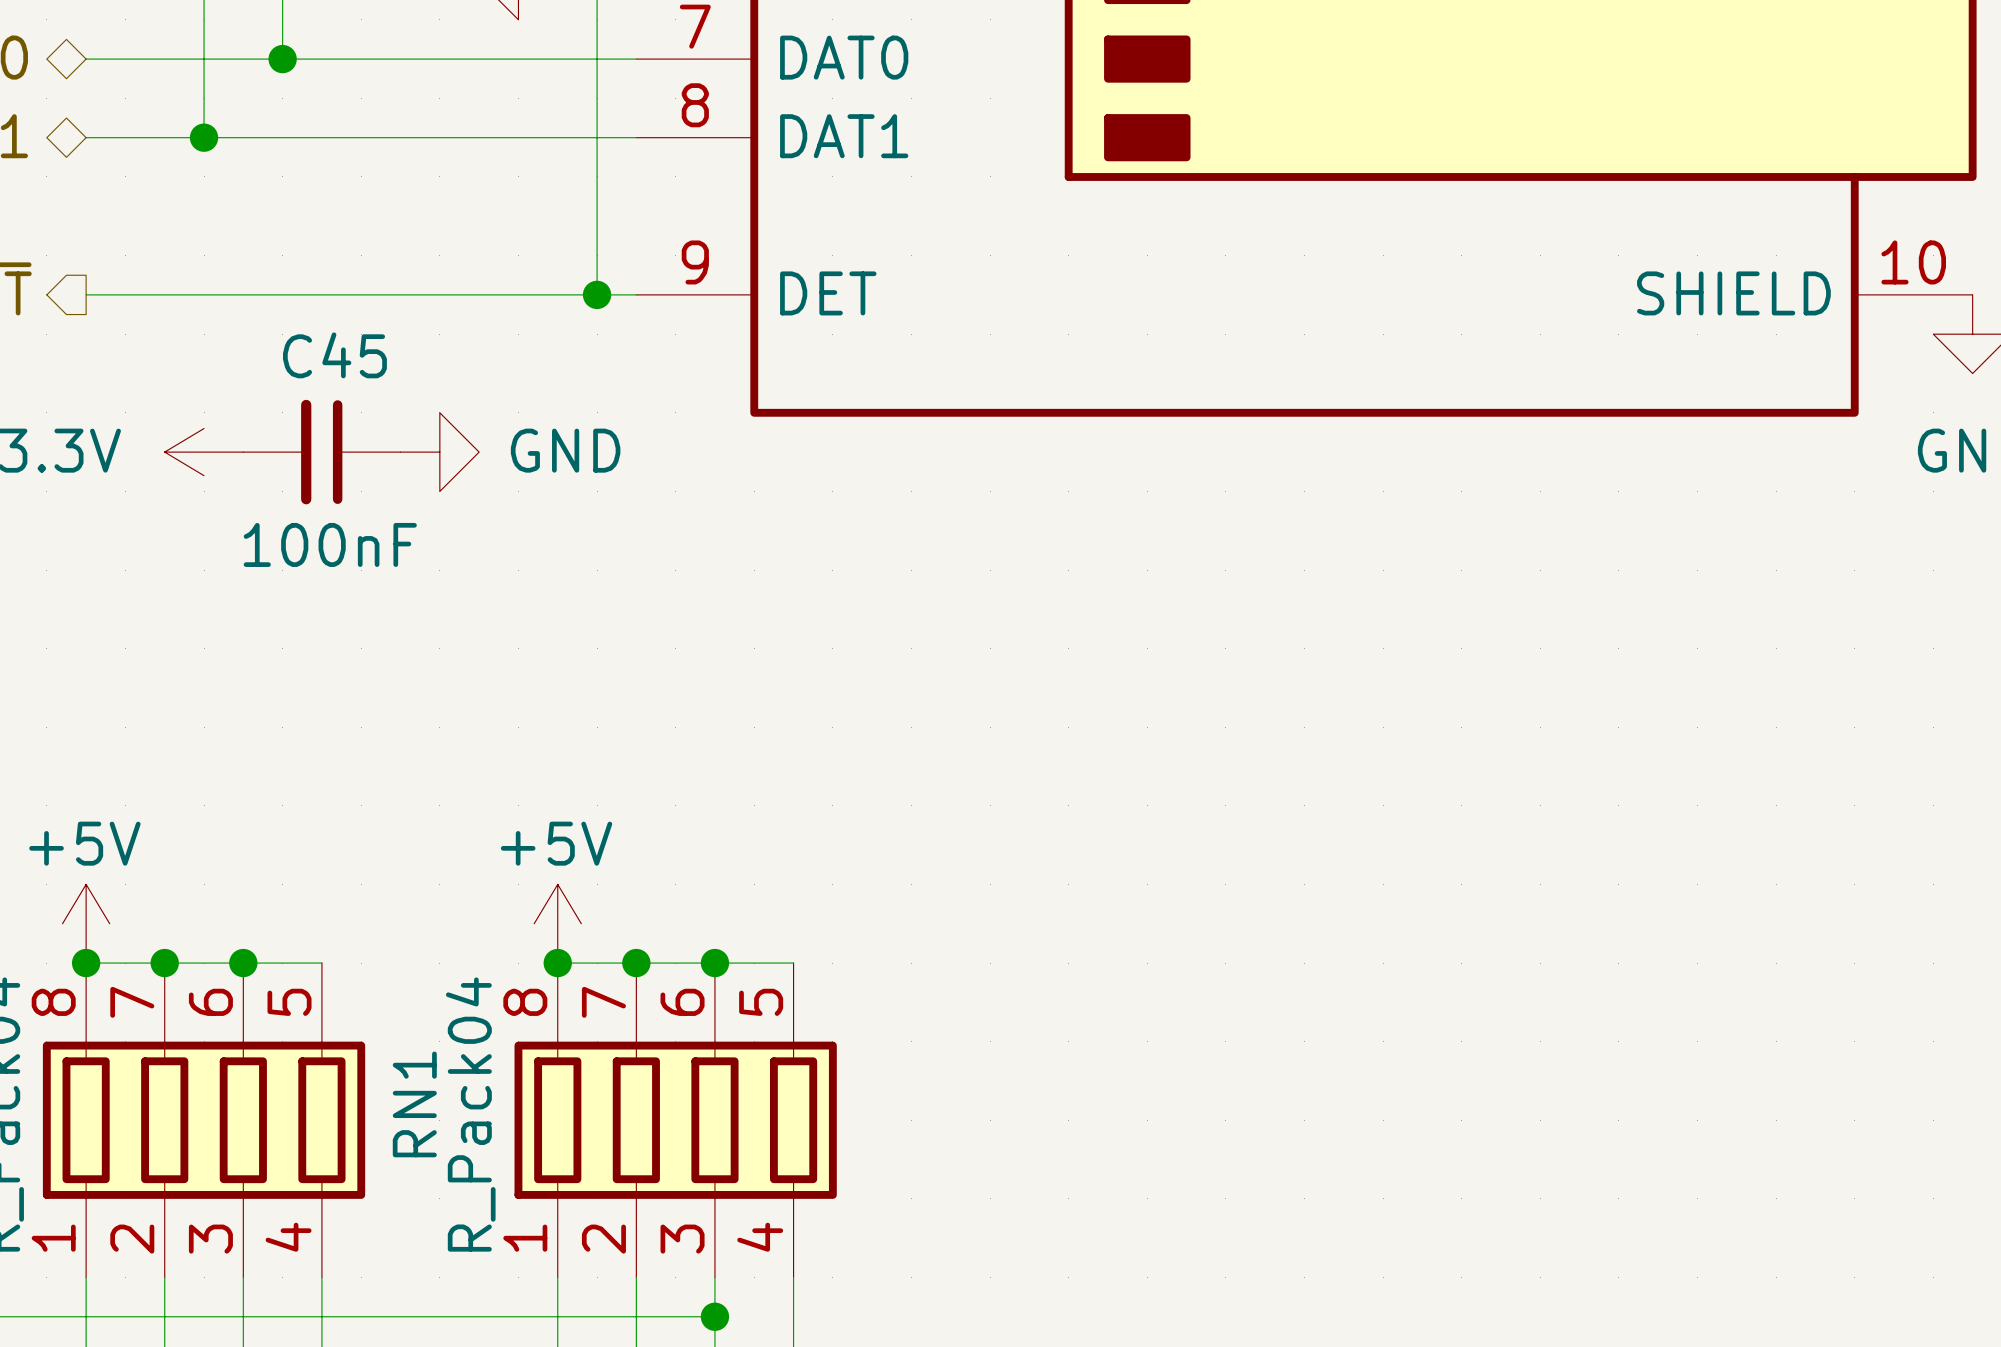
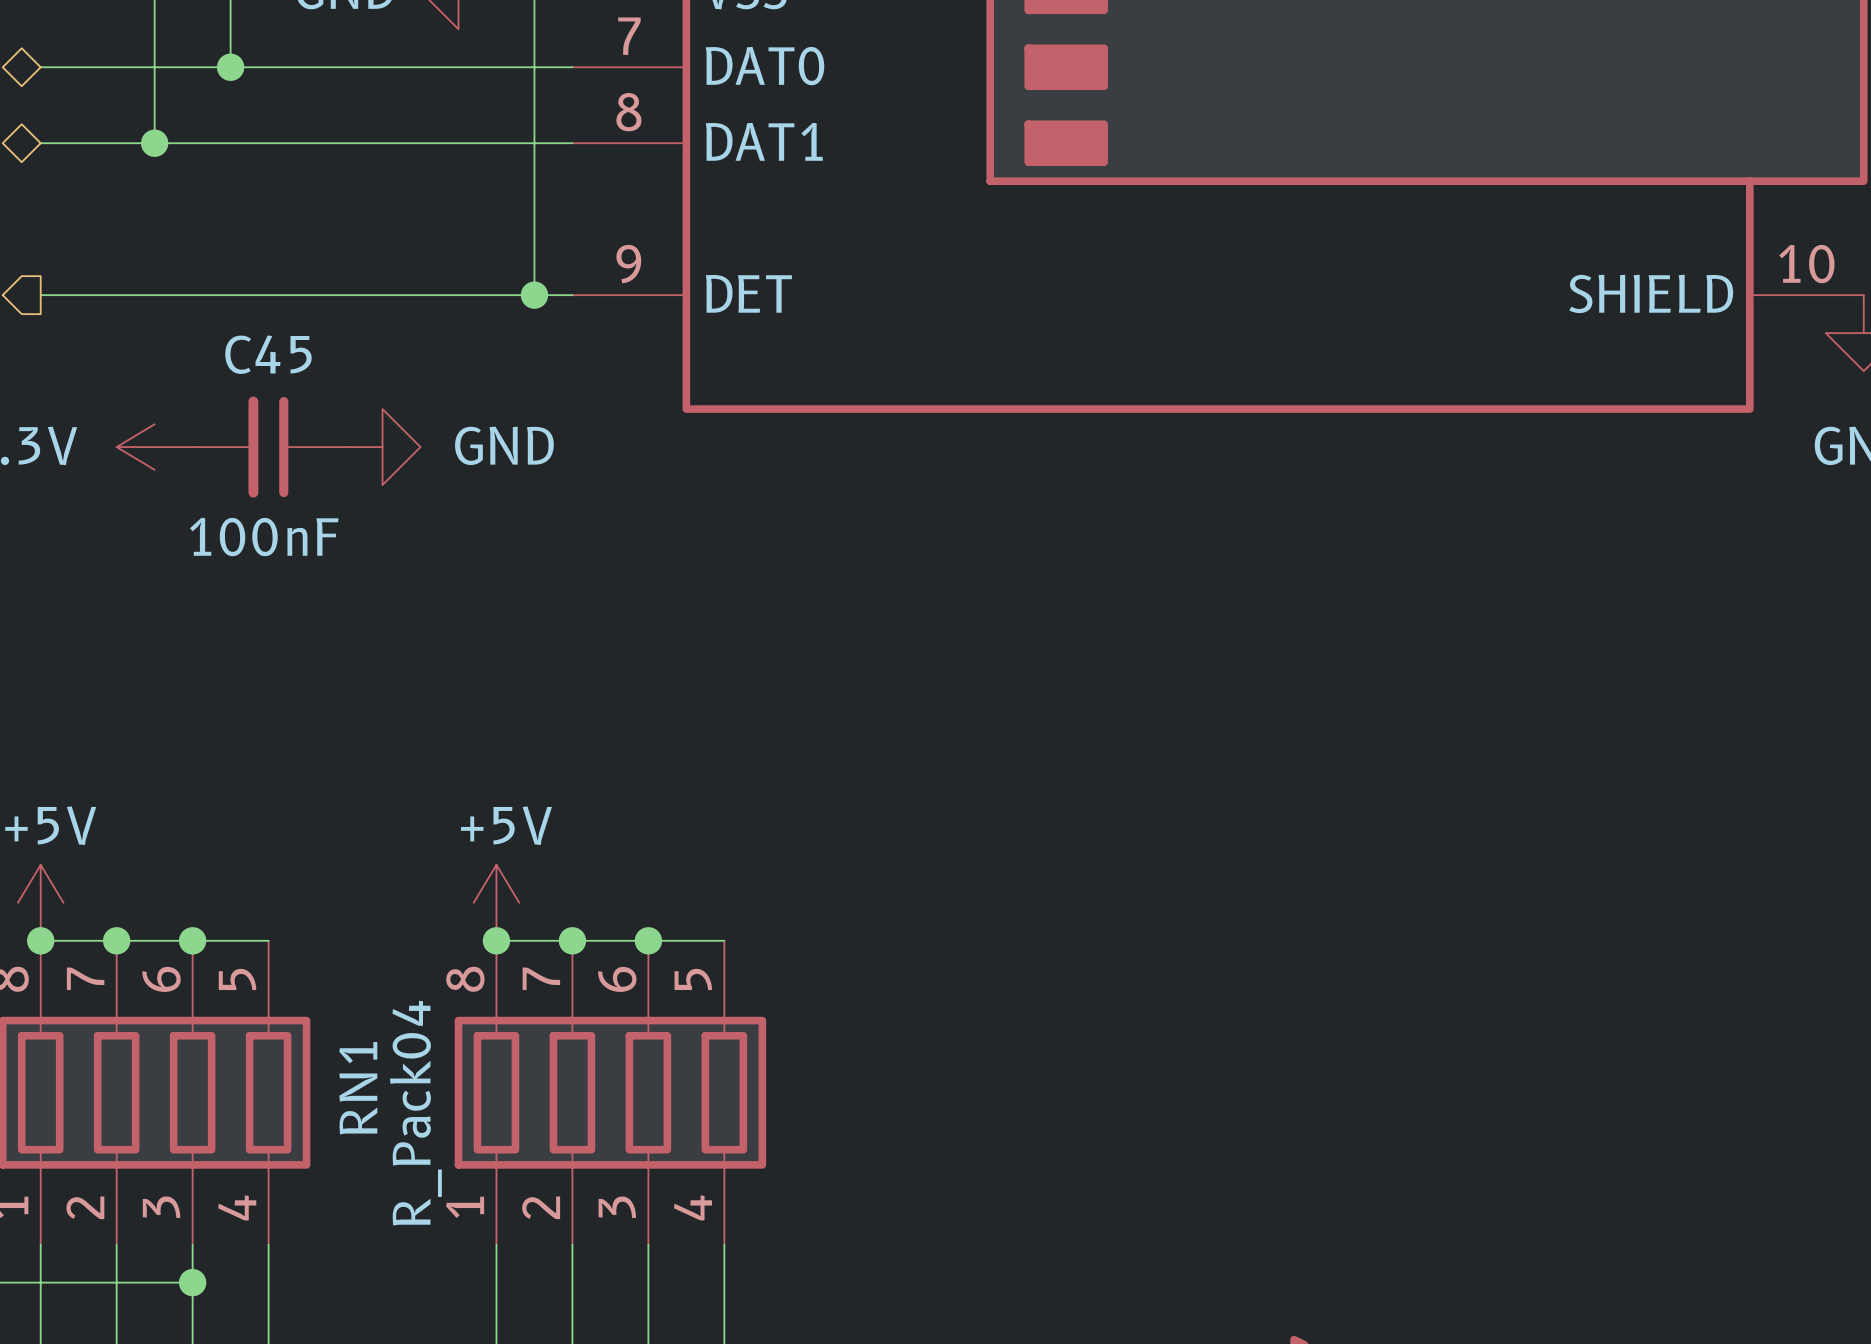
wire: (243, 1316) (714, 1316) -> none
junction: none -> (192, 1282)
junction: (714, 1316) -> none

